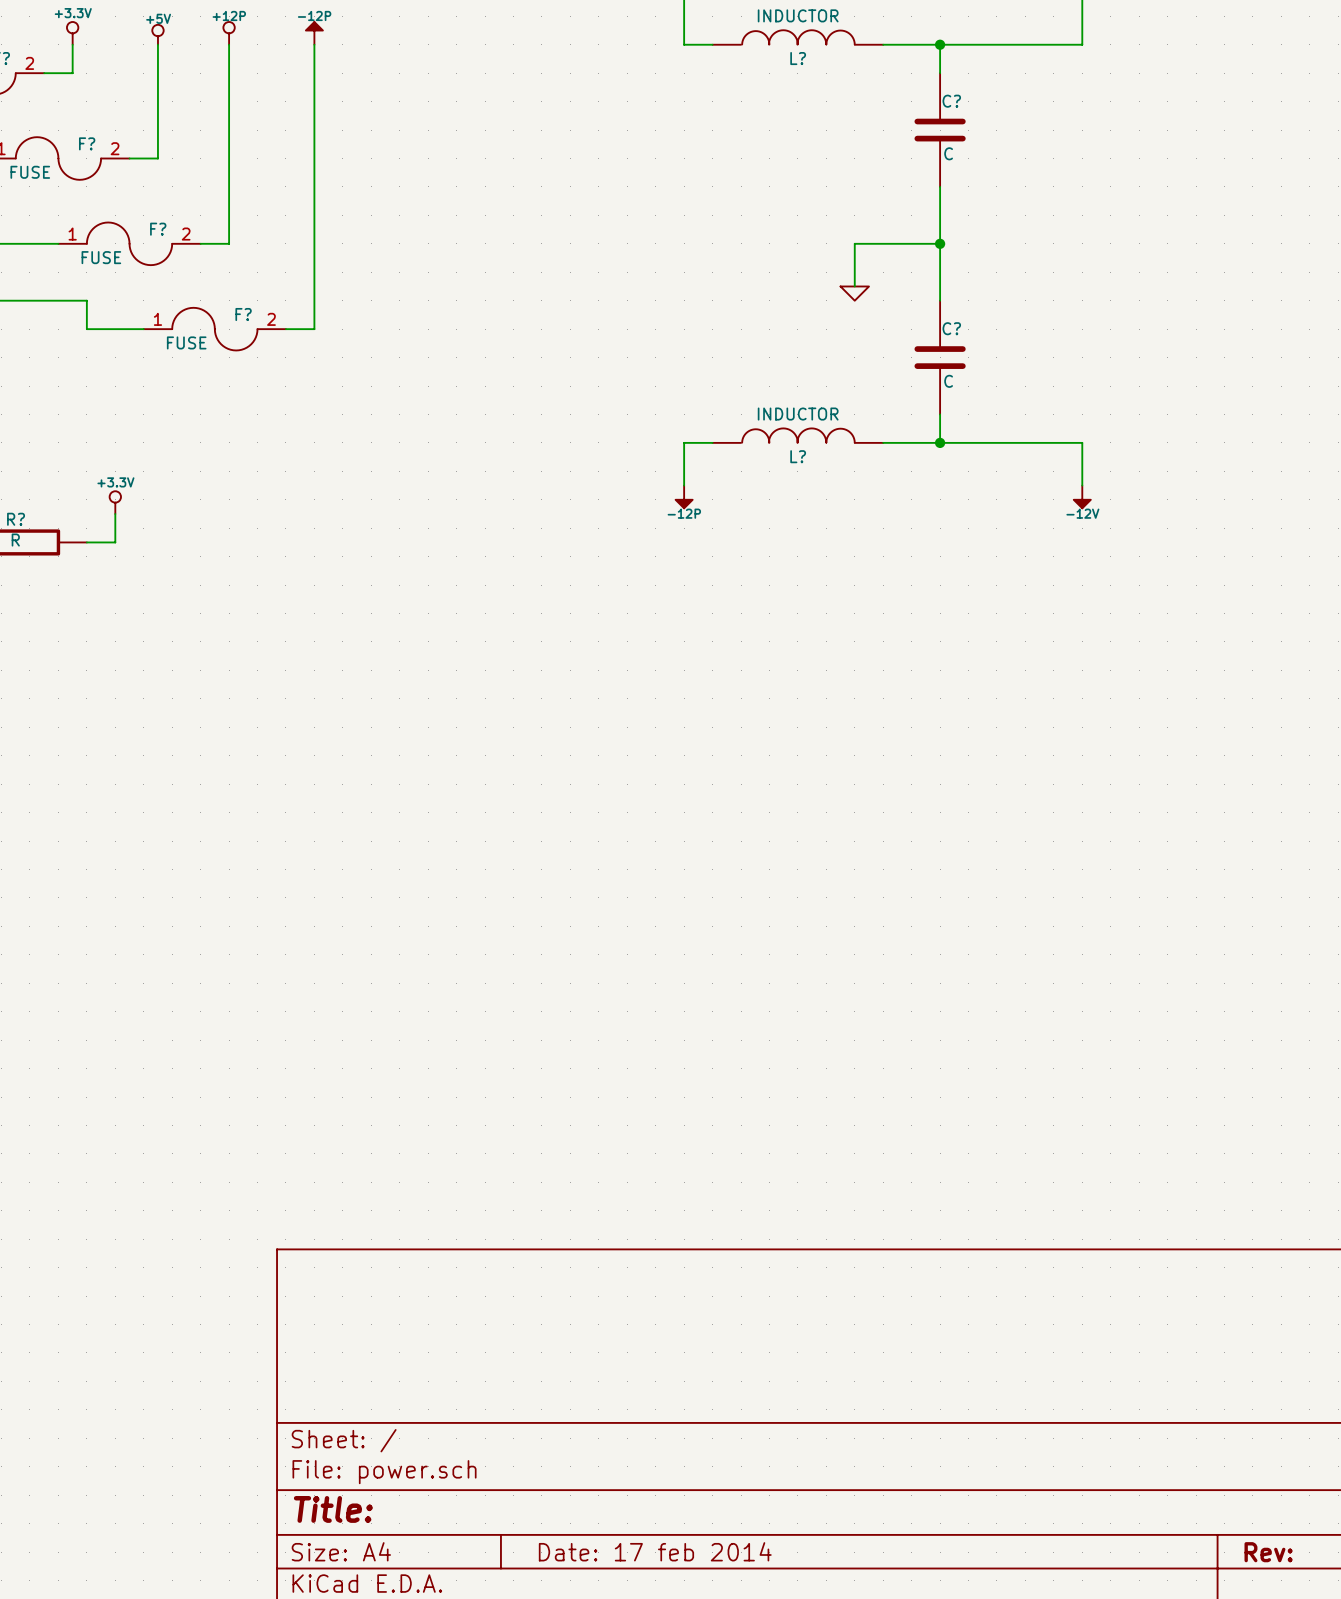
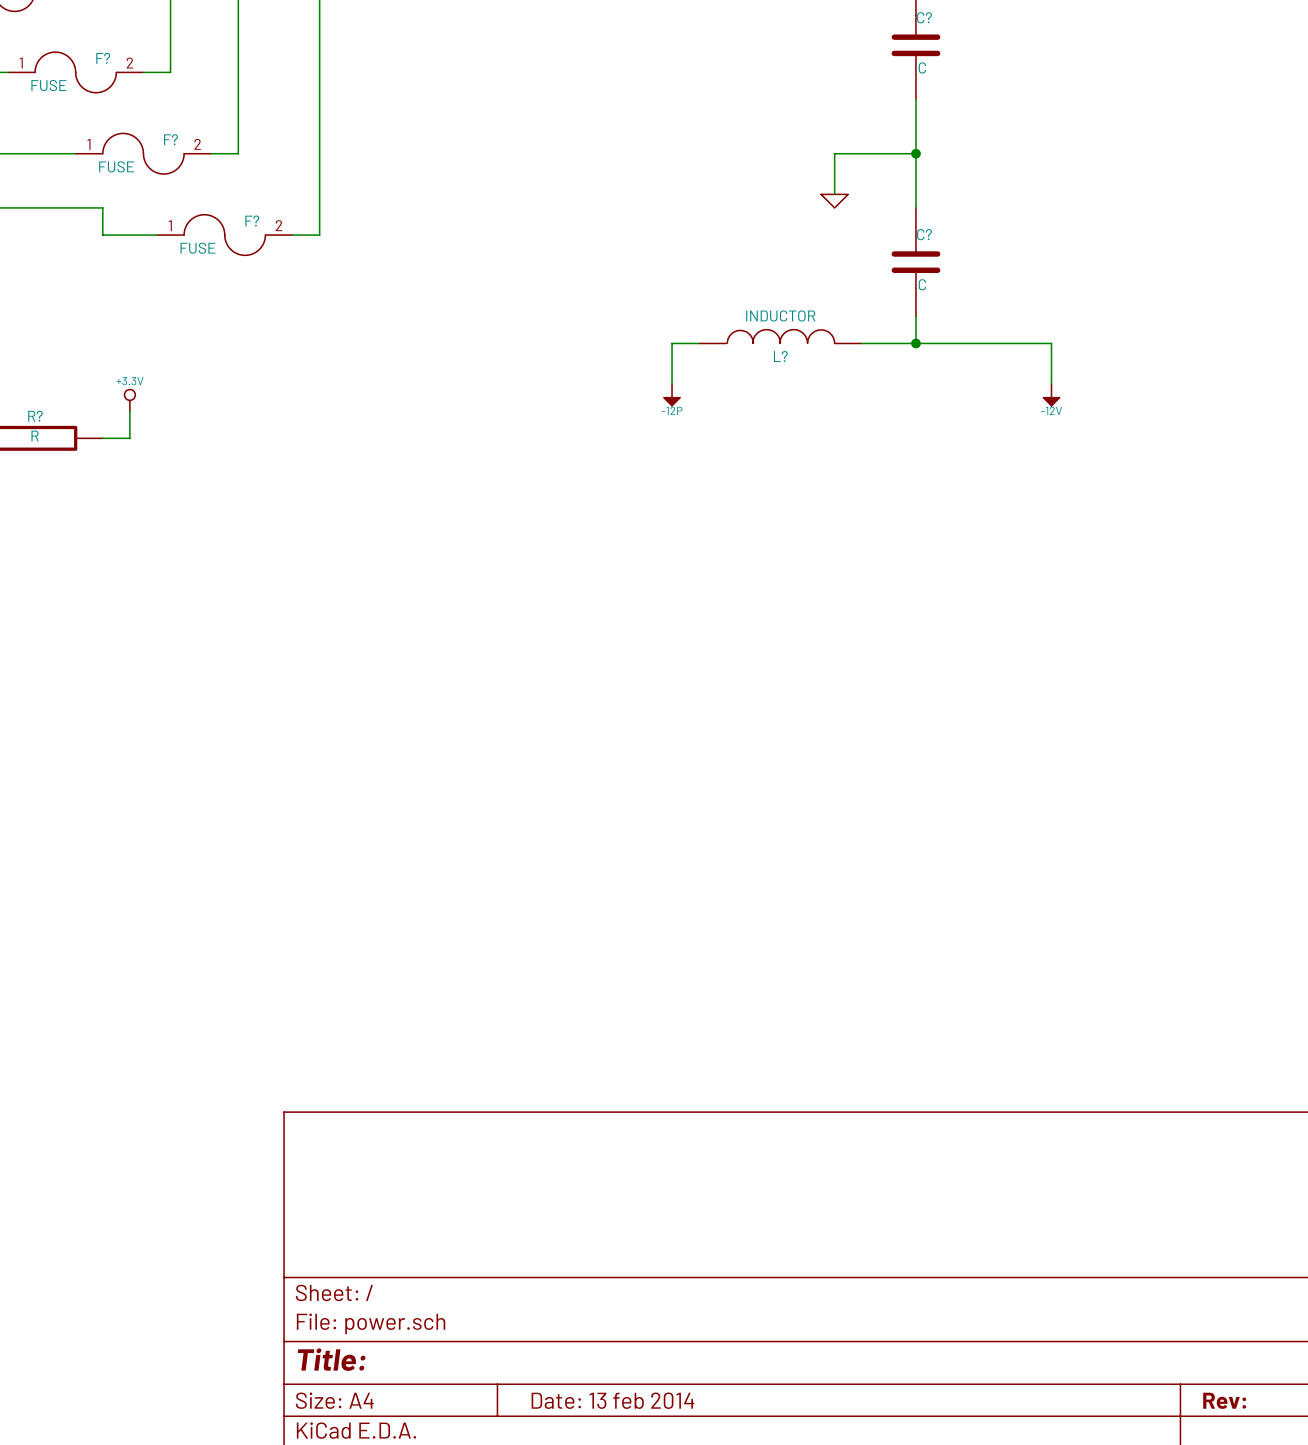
title block: Date: 17 feb 2014 (655, 1551) -> Date: 13 feb 2014 (612, 1400)

